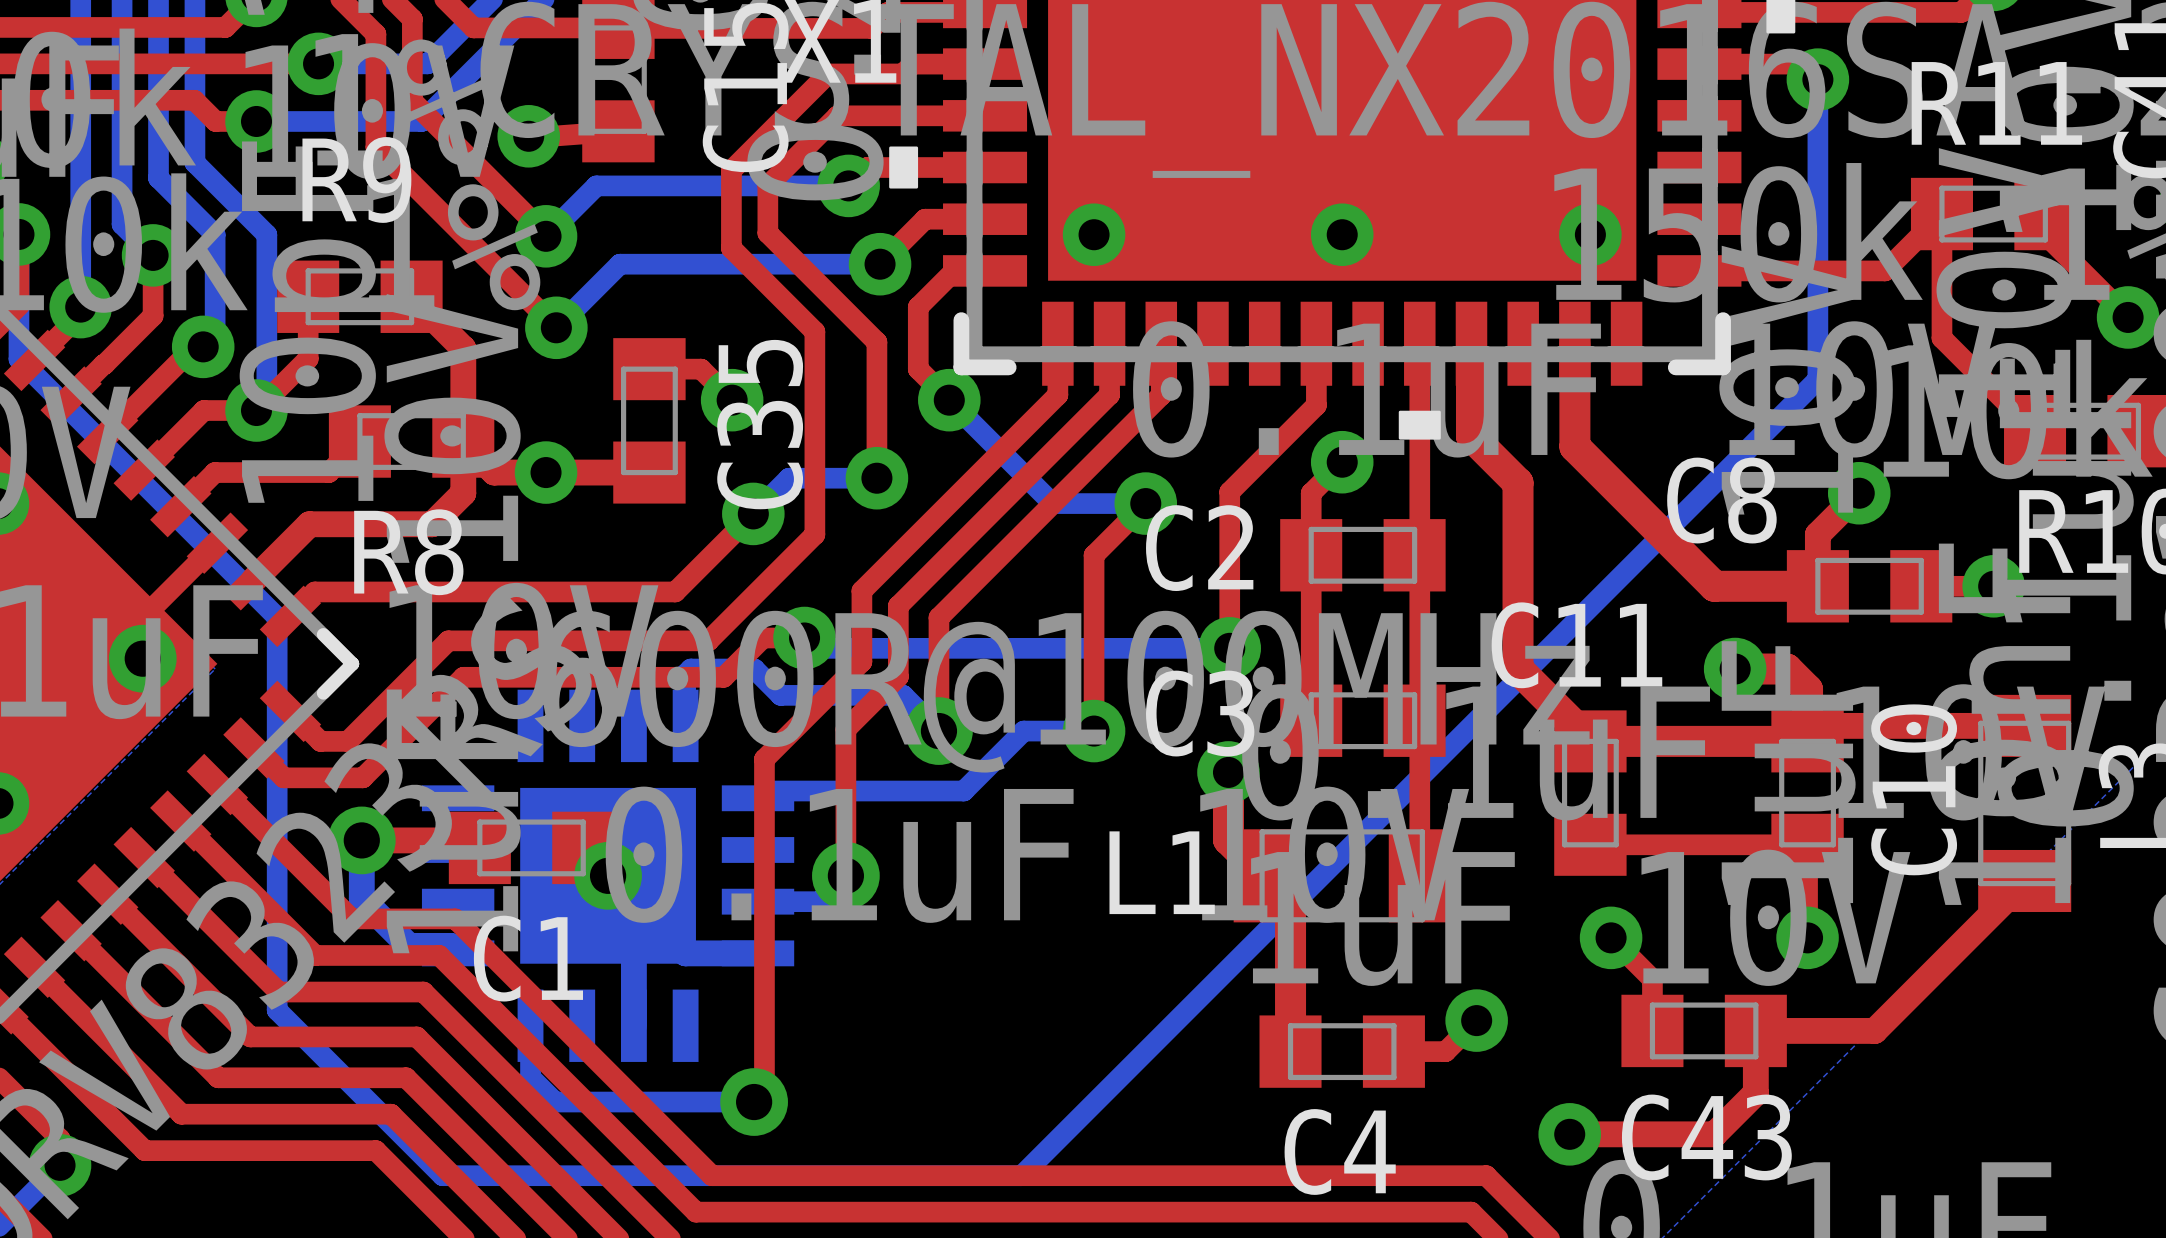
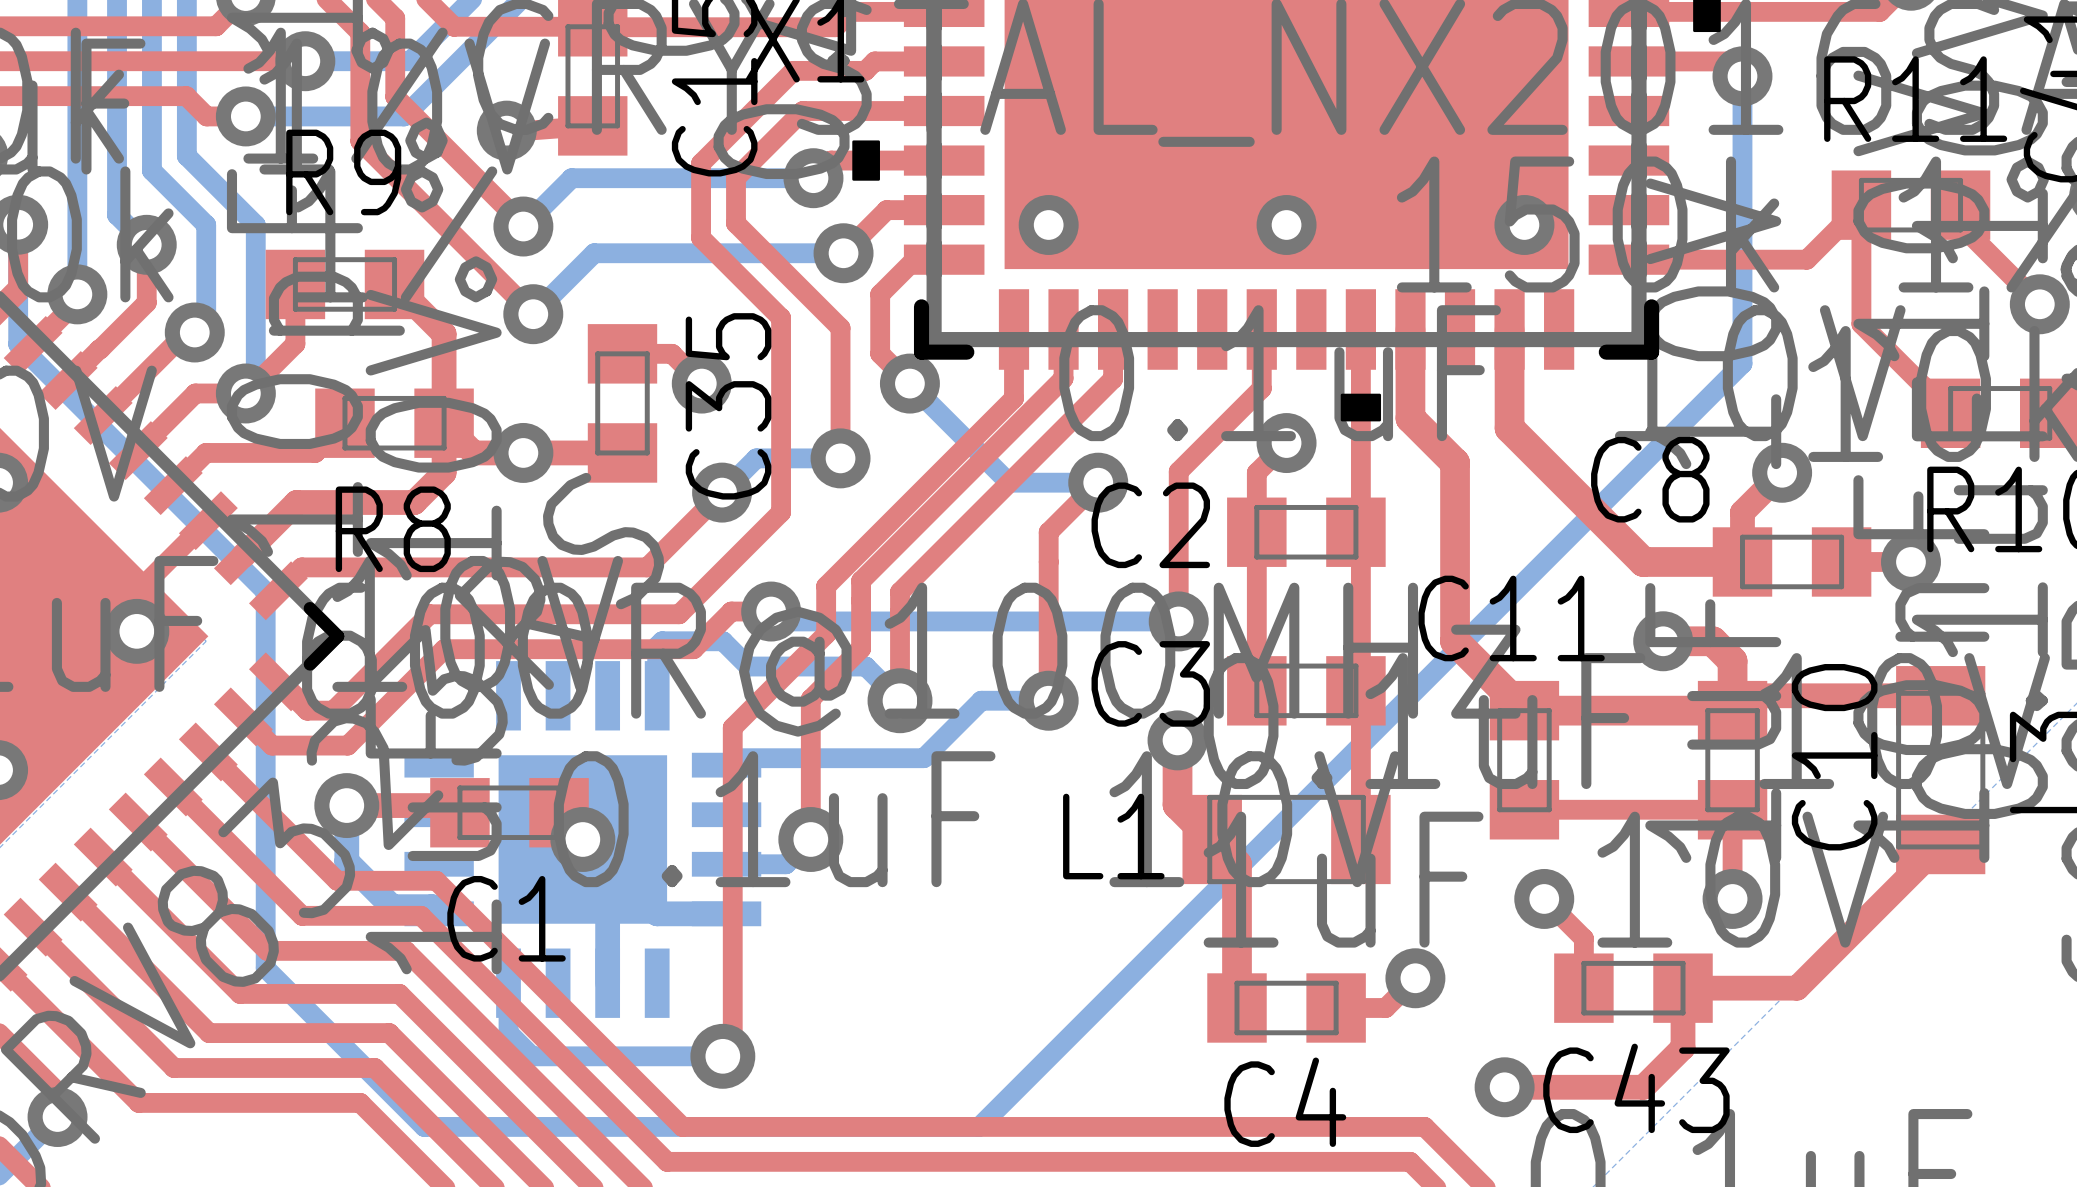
top track: (1057, 395) (861, 590) (861, 611) -> (1013, 378) (1013, 398) (826, 586)

